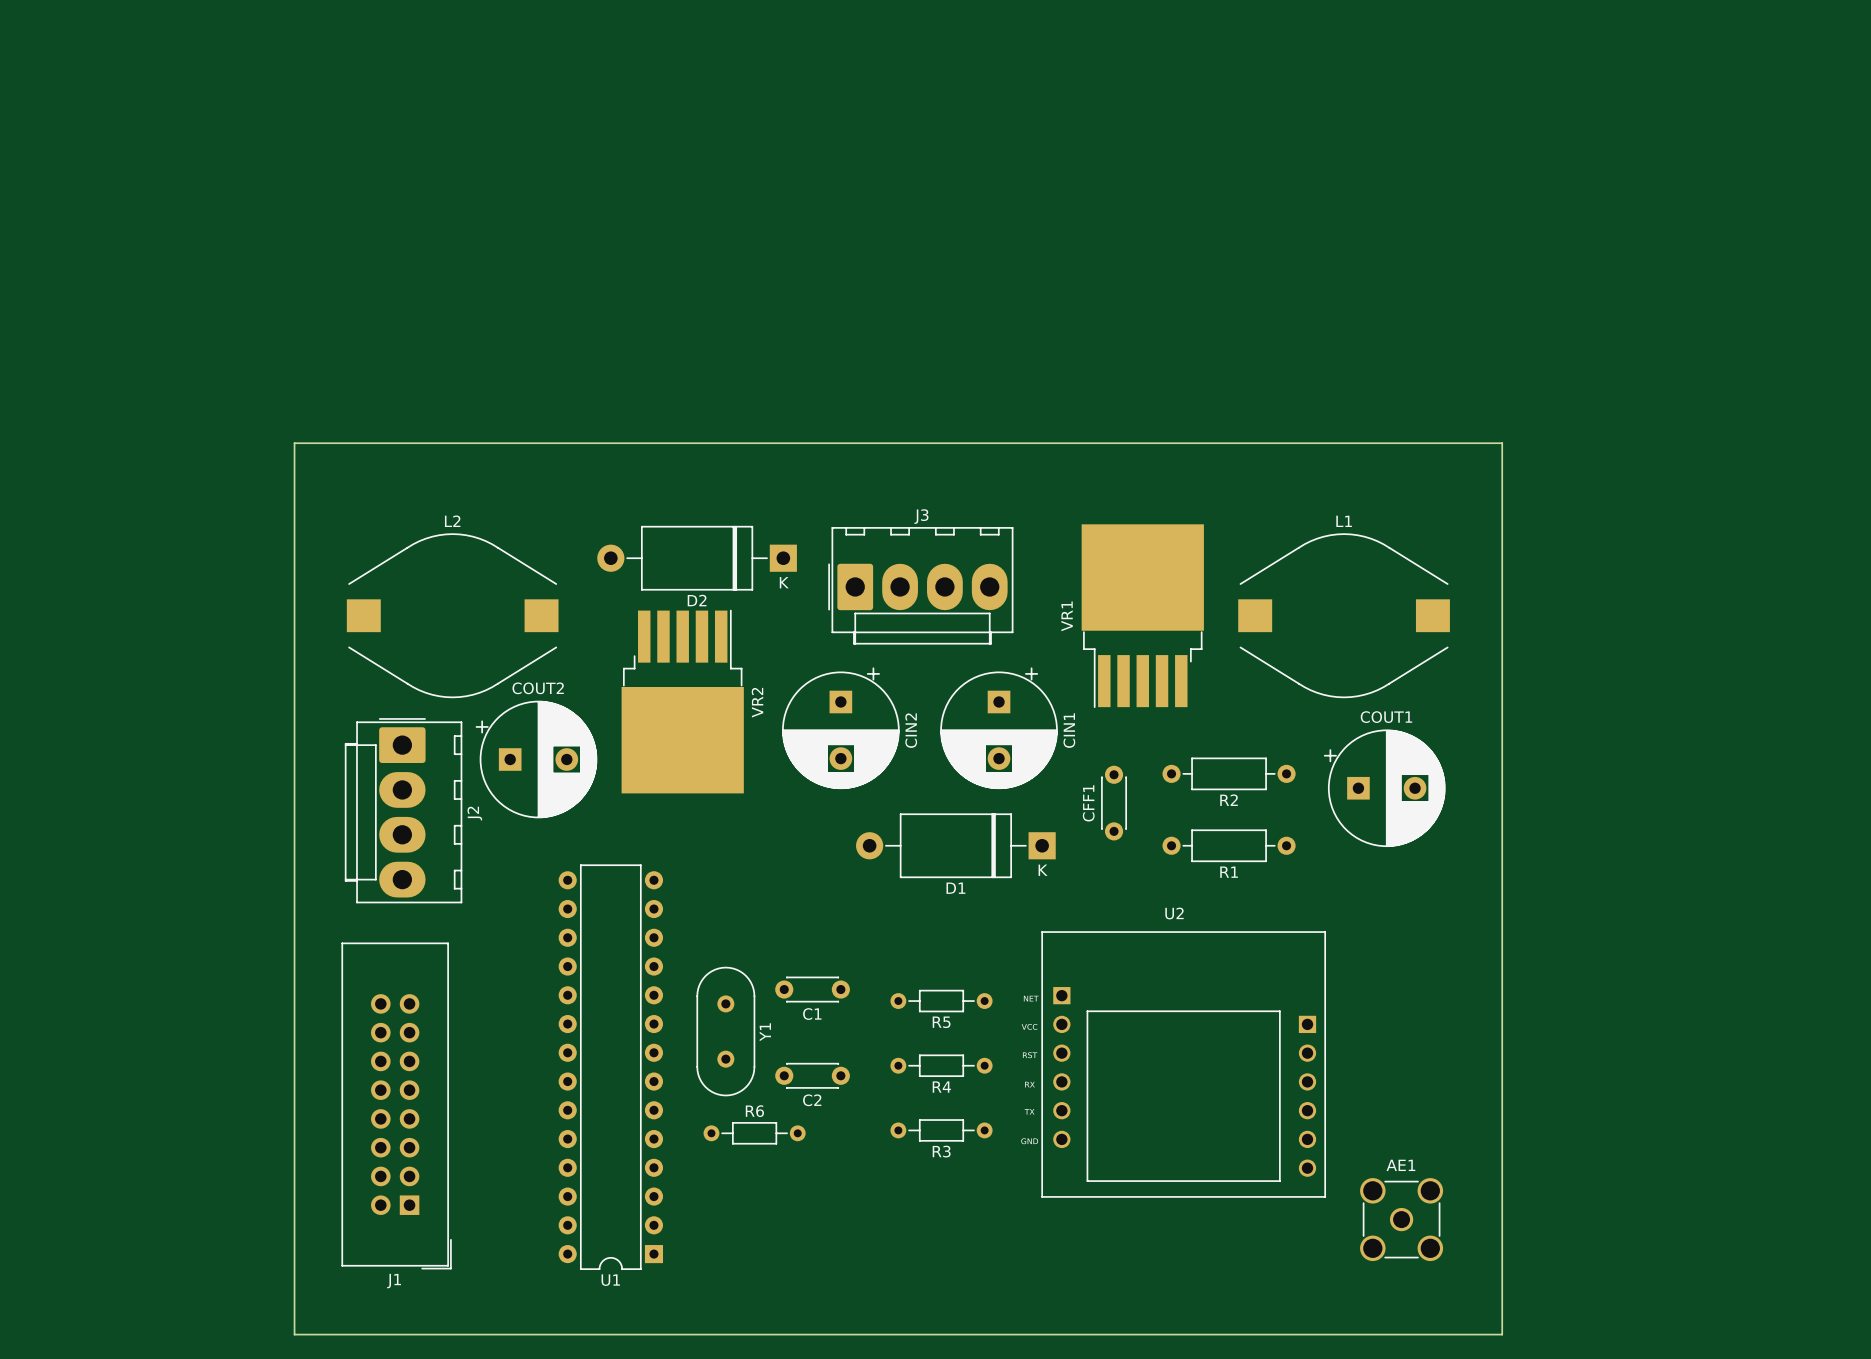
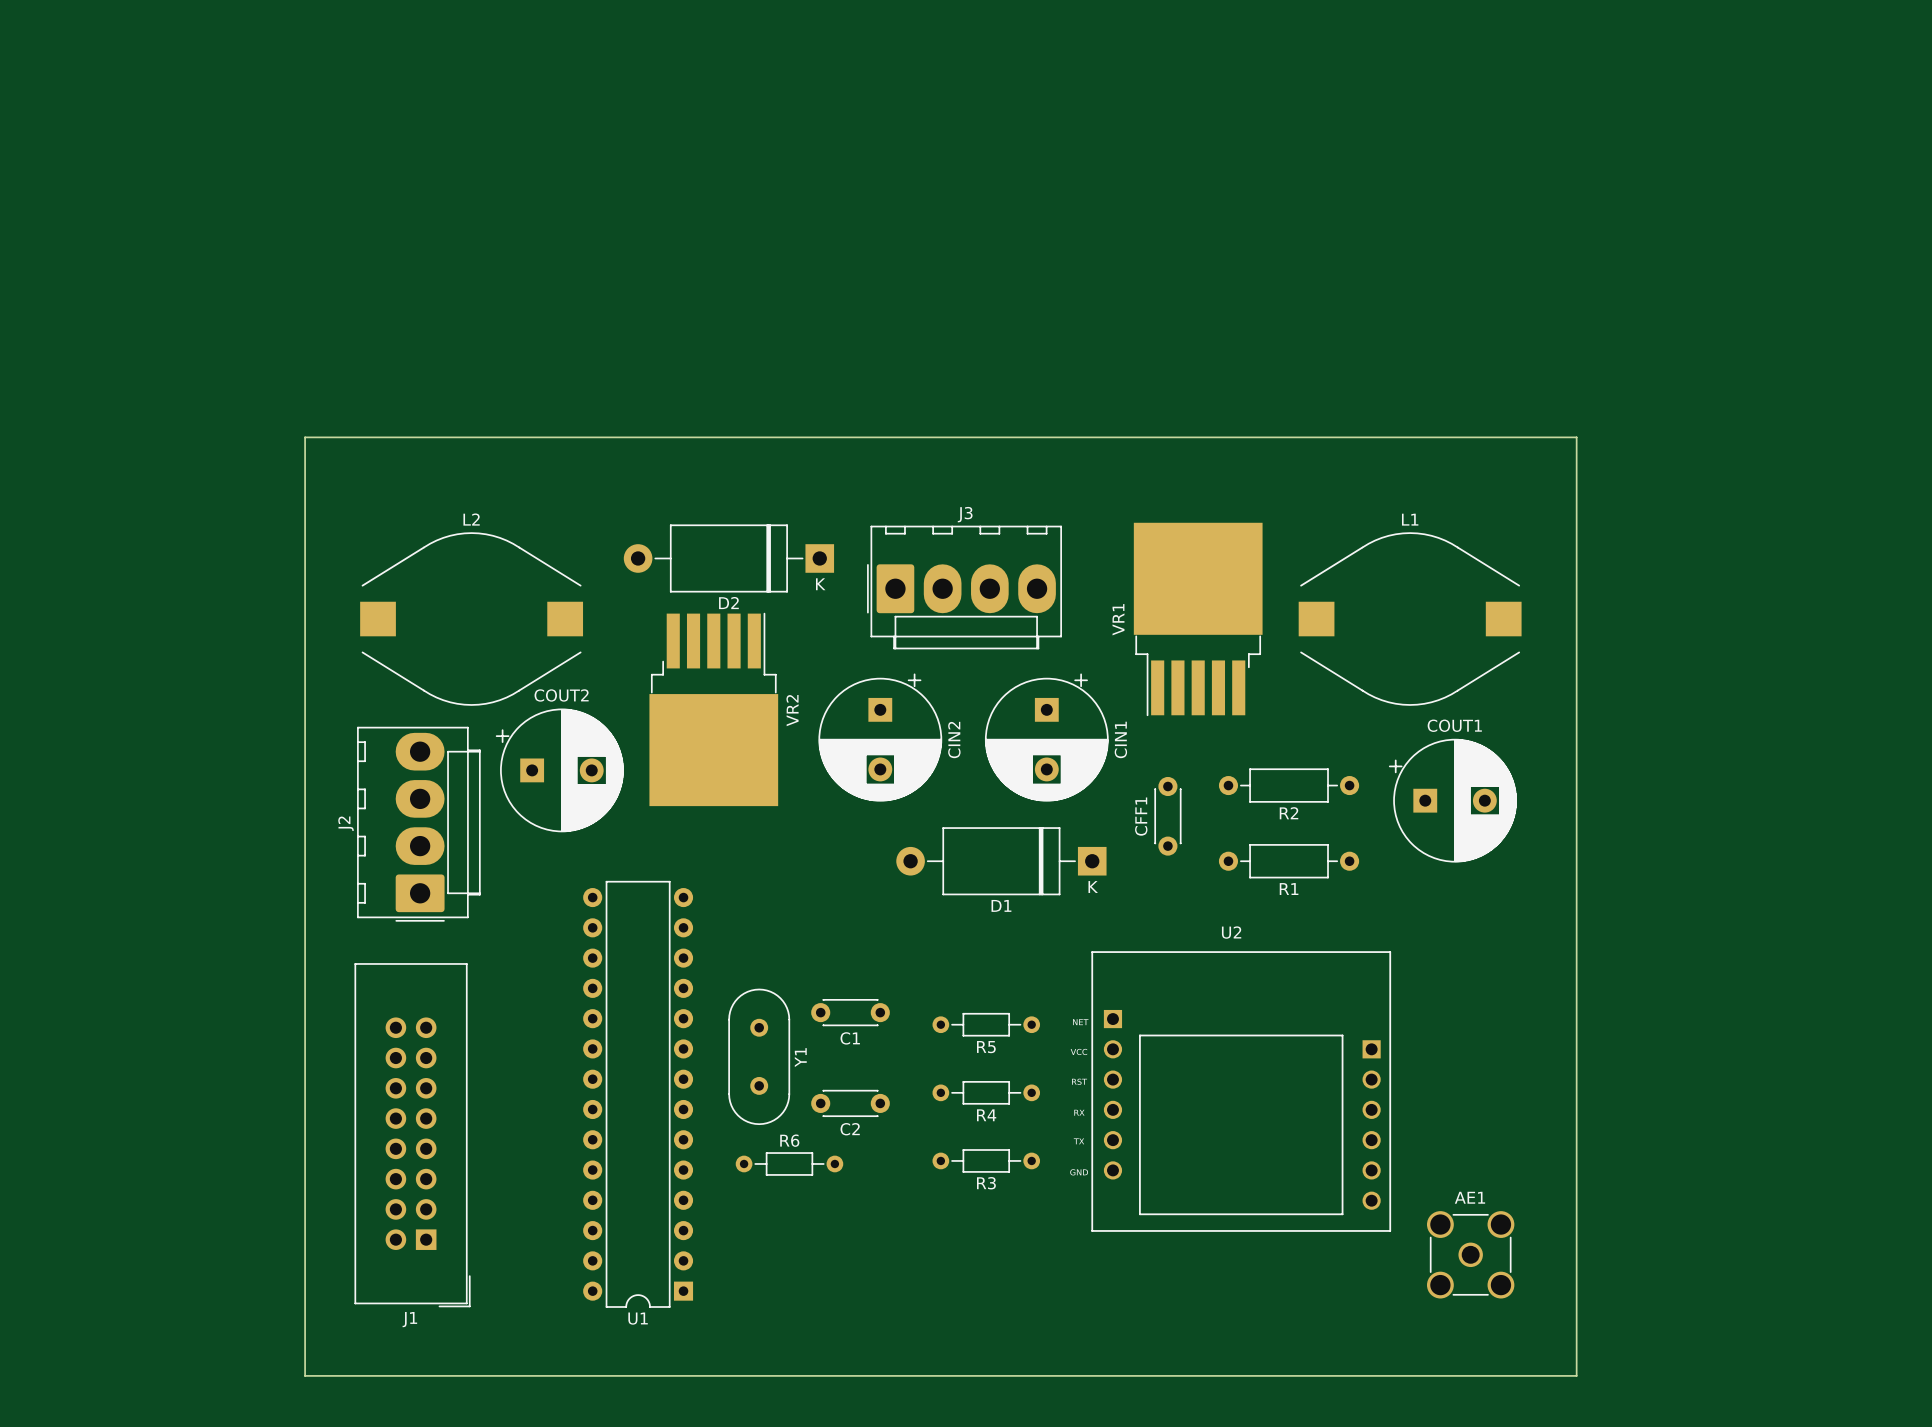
J2 rotation: 0° (403, 810) -> 180° (418, 824)

